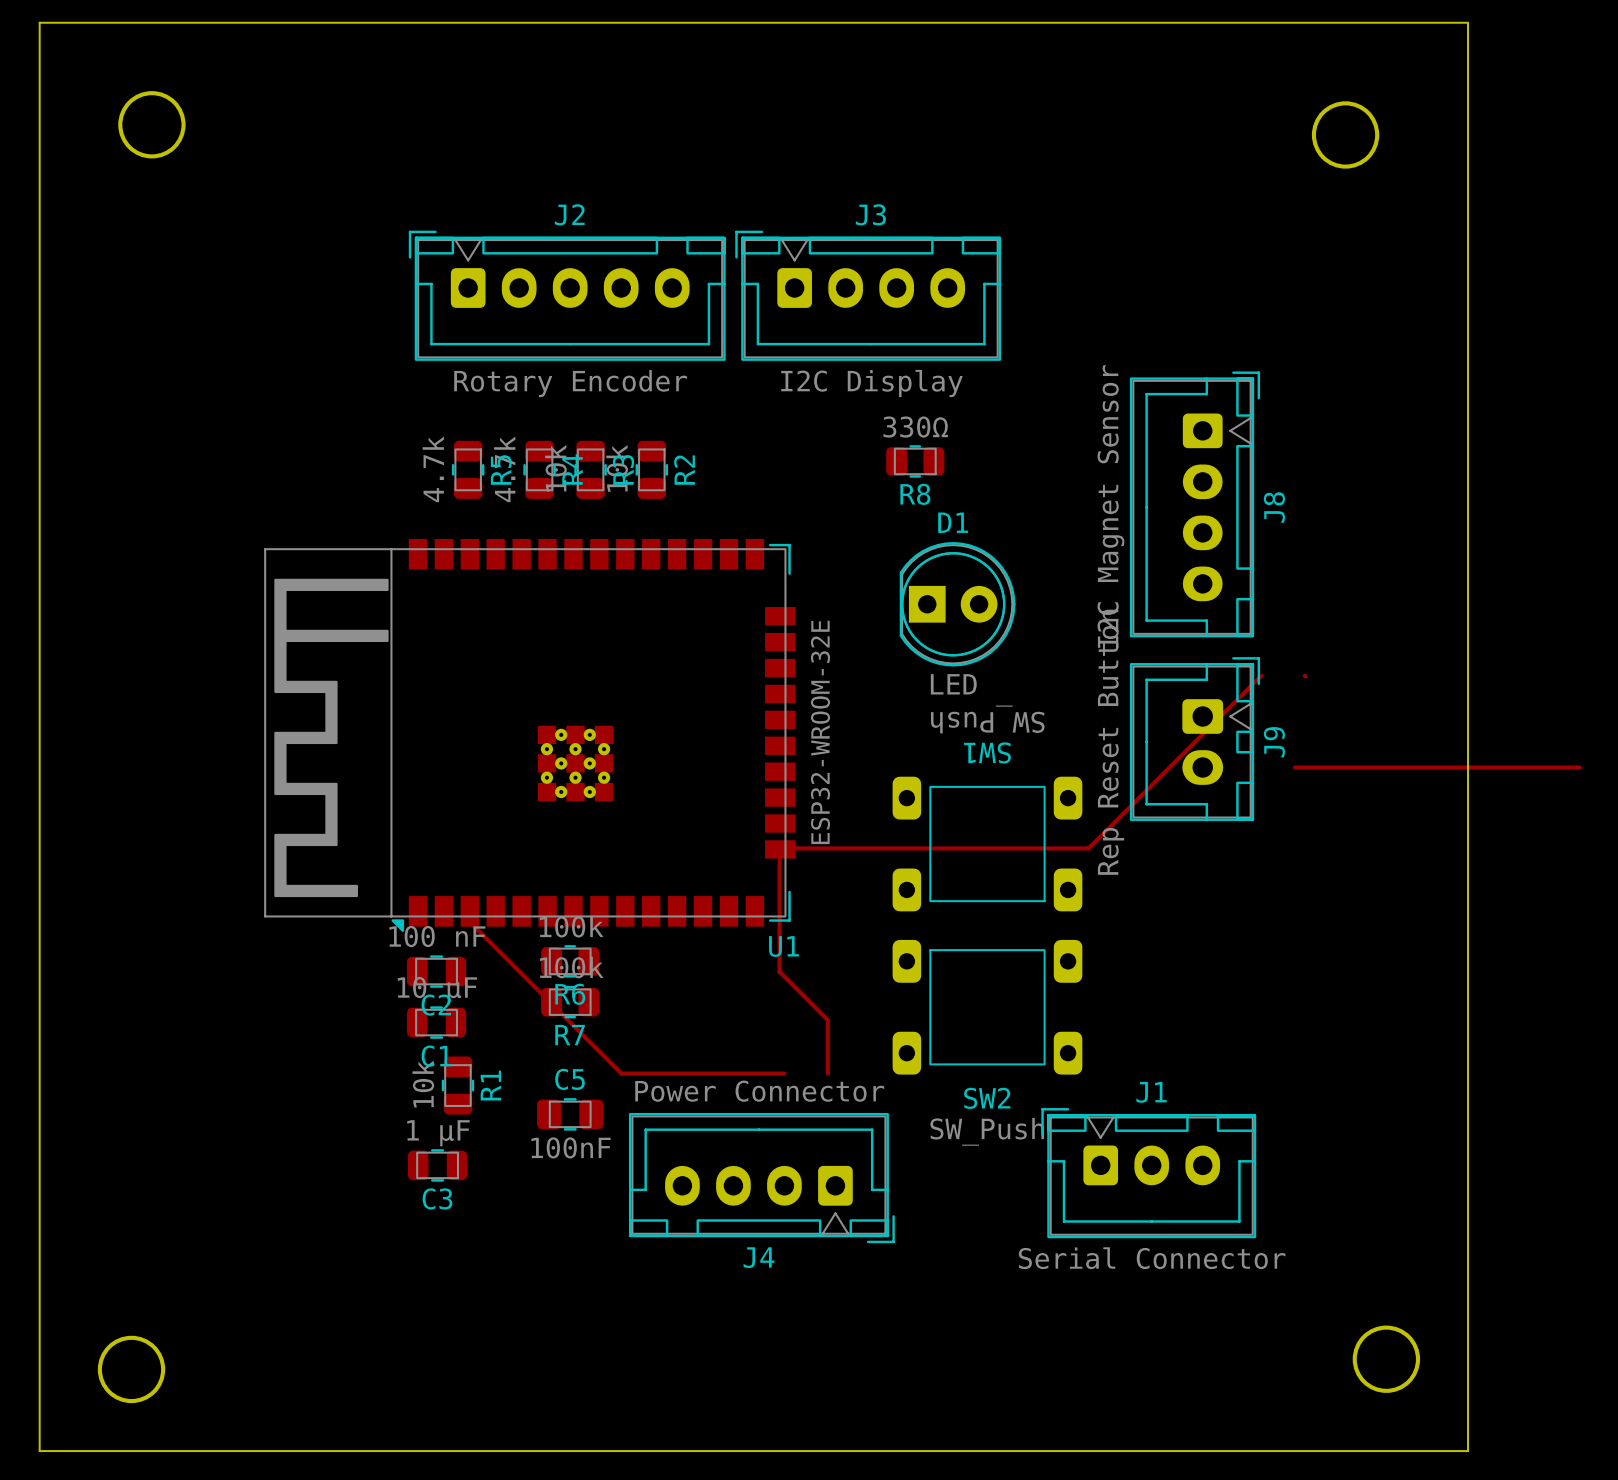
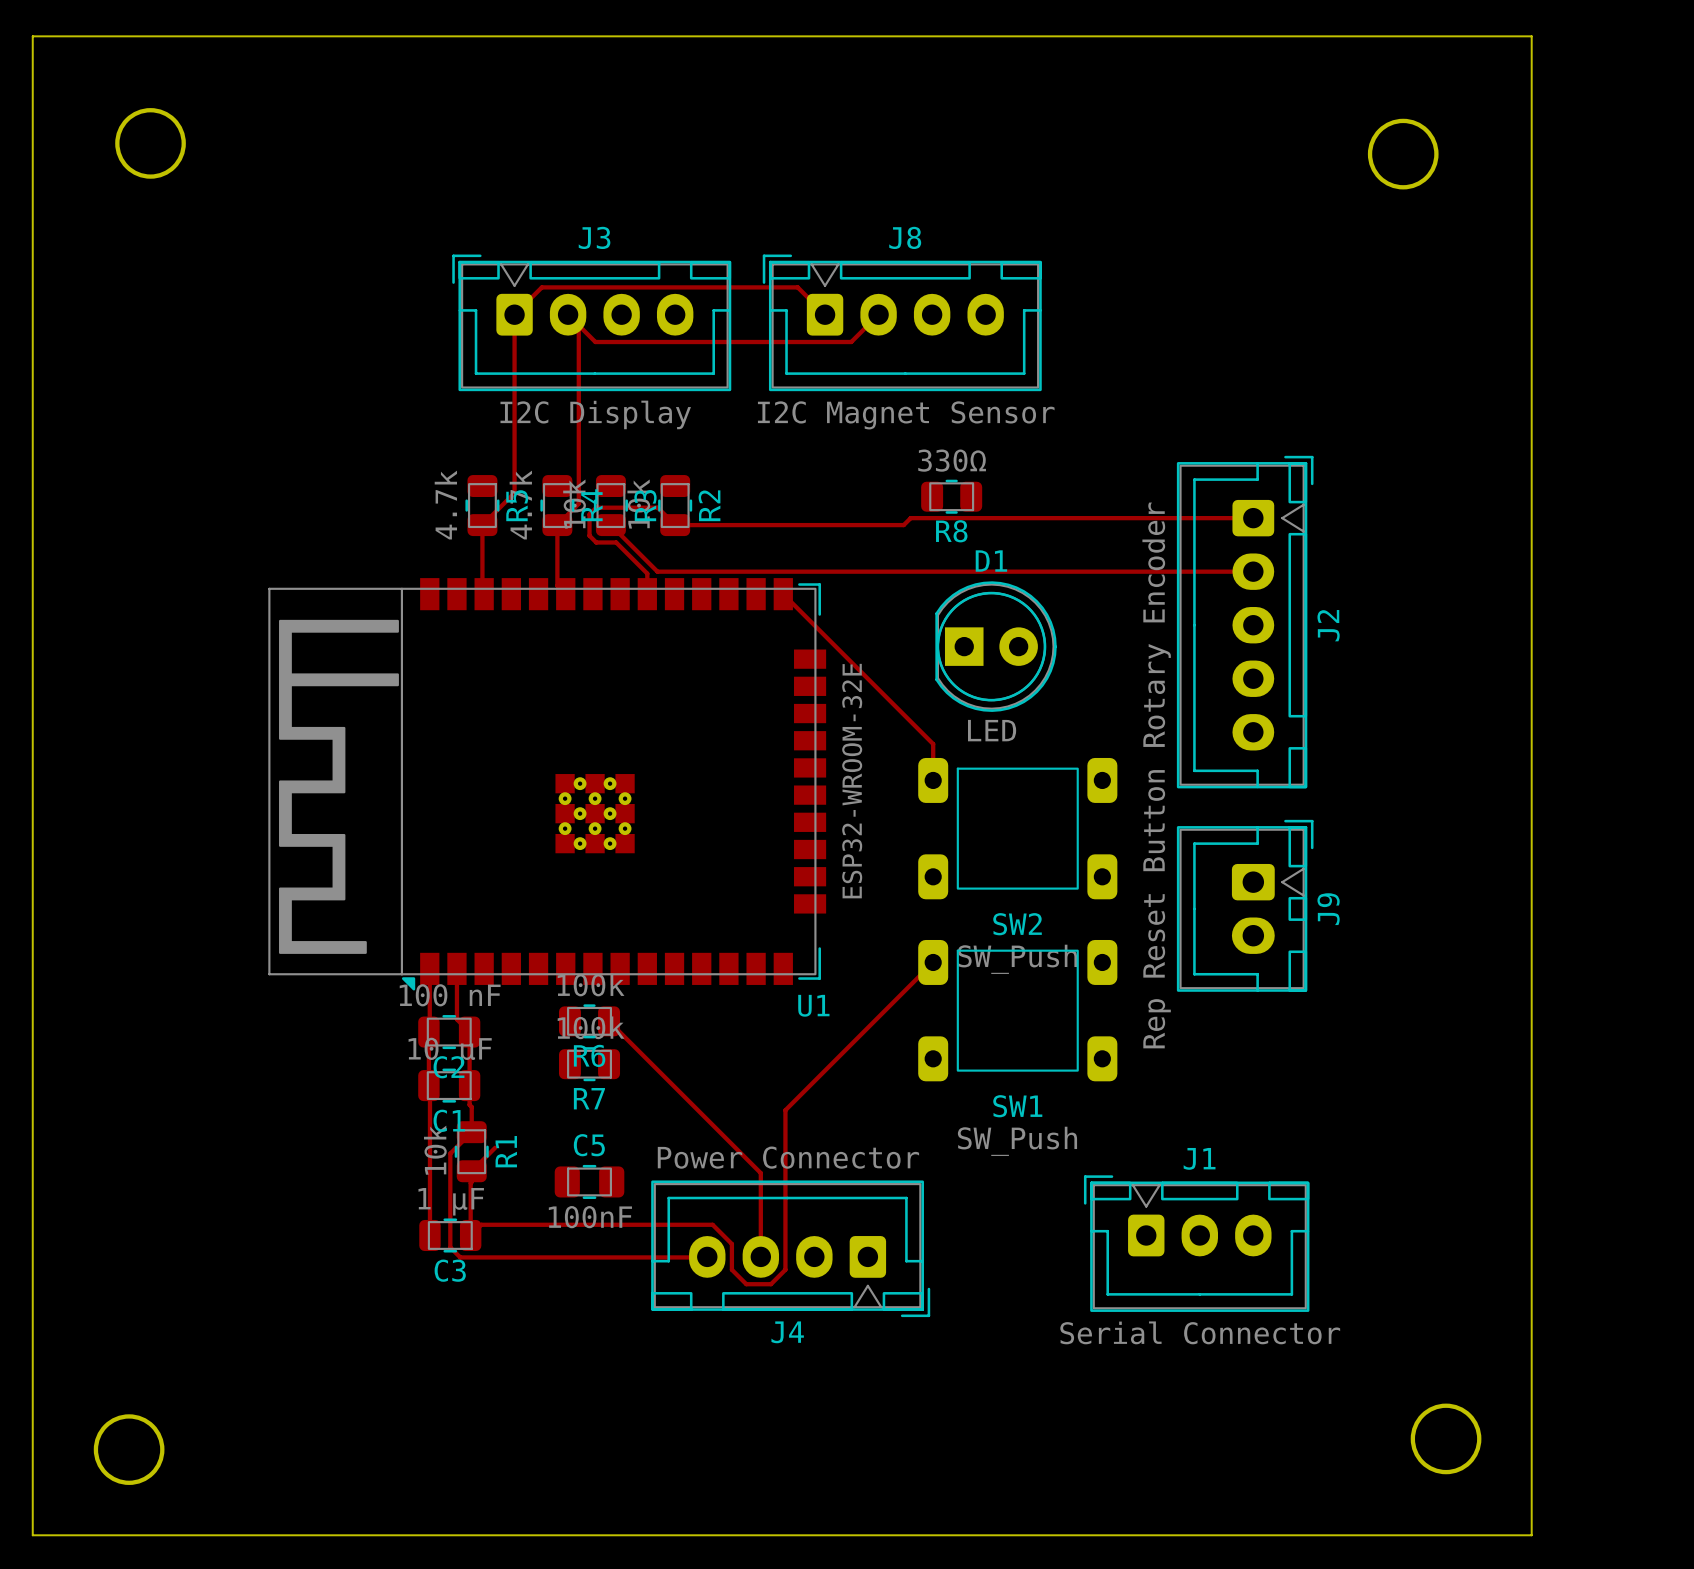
J3 name: J3 (870, 214) -> J8 (905, 237)
top track: none -> (568, 314) (595, 342) (851, 342) (878, 314)
top track: none -> (825, 314) (797, 287) (541, 287) (514, 314) (514, 492) (482, 525) (482, 592) (484, 594)
J2 rotation: 0° (567, 295) -> 90° clockwise (1245, 622)
J2 position: (567, 295) -> (1245, 622)
J3: none -> I2C Display (591, 322)
top track: none -> (578, 325) (578, 503) (557, 525) (557, 585) (565, 594)
J3 value: I2C Display (871, 383) -> I2C Magnet Sensor (906, 415)
top track: none -> (1253, 518) (910, 518) (903, 525) (675, 525) (657, 507) (596, 507) (589, 514) (589, 535) (596, 542) (616, 542) (647, 573) (647, 594)
top track: none -> (610, 525) (657, 571) (1253, 571)
J8: I2C Magnet Sensor (1194, 504) -> none
top track: none -> (783, 594) (933, 744) (933, 780)
top track: (1261, 675) (1088, 848) (779, 848) (779, 971) (827, 1020) (827, 1073) -> none
top track: (1304, 675) (1305, 676) -> none
SW1 value rotation: 0° (987, 719) -> 180° (1017, 1141)
SW1 value position: SW_Push (987, 719) -> SW_Push (1017, 1141)
J9 position: (1194, 739) -> (1245, 905)
SW1 name rotation: 0° (987, 752) -> 180° (1017, 1106)
SW1 name position: SW1 (987, 752) -> SW1 (1017, 1106)
top track: (1294, 767) (1579, 767) -> none
SW1 position: (987, 844) -> (1017, 1010)
top track: none -> (933, 962) (785, 1110) (785, 1269) (771, 1284) (746, 1284) (731, 1269) (731, 1244) (712, 1224) (481, 1224) (470, 1235) (471, 1171) (495, 1147)
top track: none -> (429, 968) (429, 1235)
top track: none -> (456, 968) (456, 1019) (469, 1032) (469, 1104) (471, 1107) (471, 1132) (450, 1153) (450, 1247) (460, 1257) (707, 1256)
top track: (468, 921) (621, 1073) (784, 1073) -> none
top track: none -> (609, 1021) (760, 1173) (760, 1256)
SW2 position: (987, 1007) -> (1017, 828)

